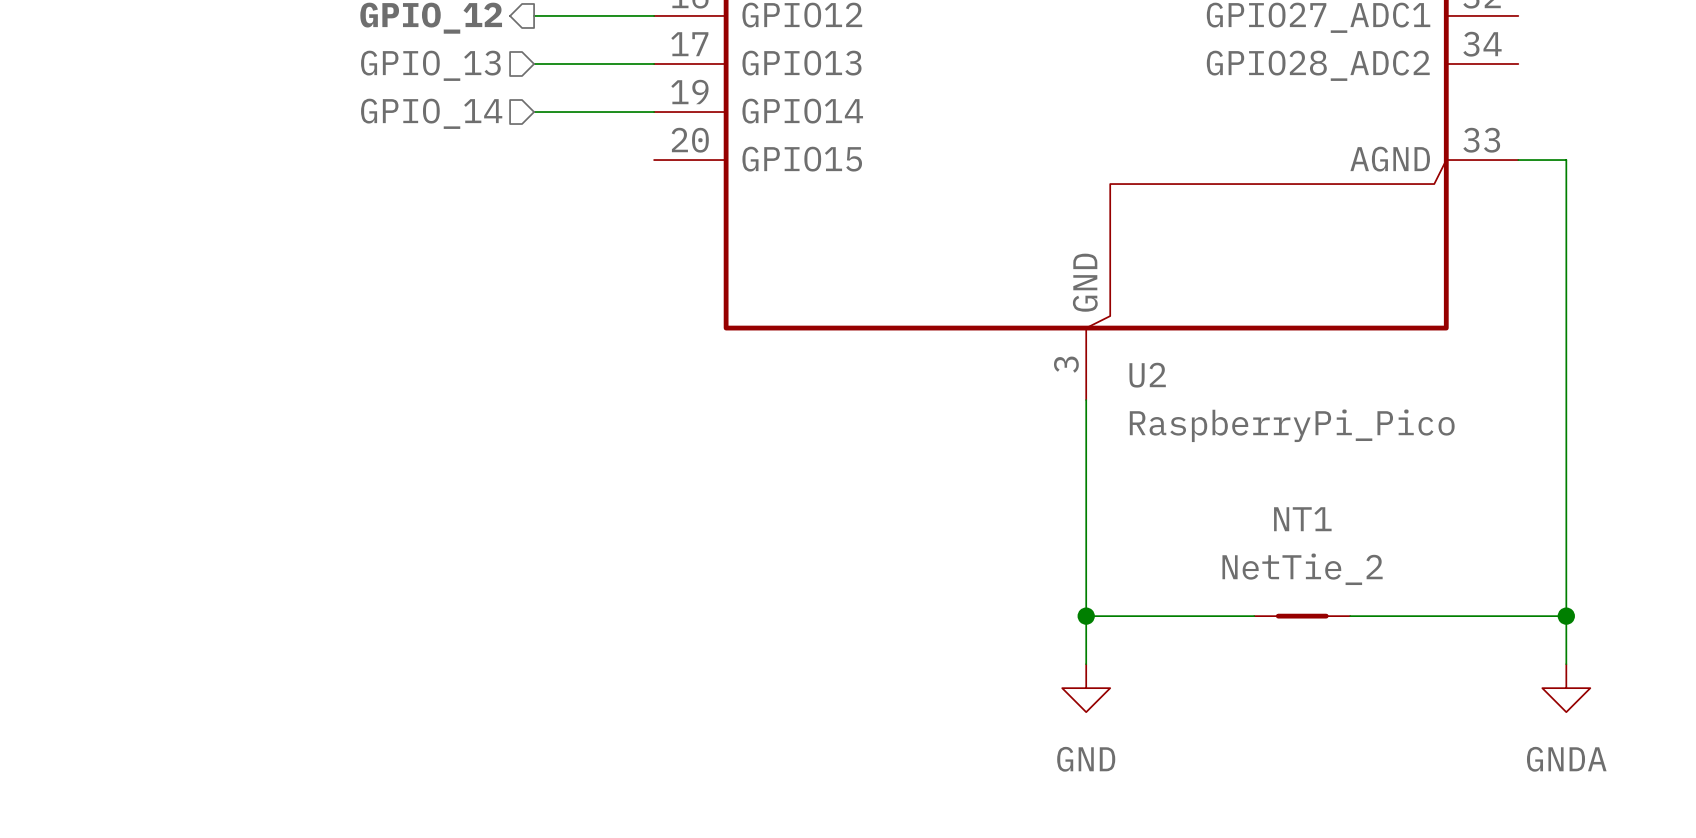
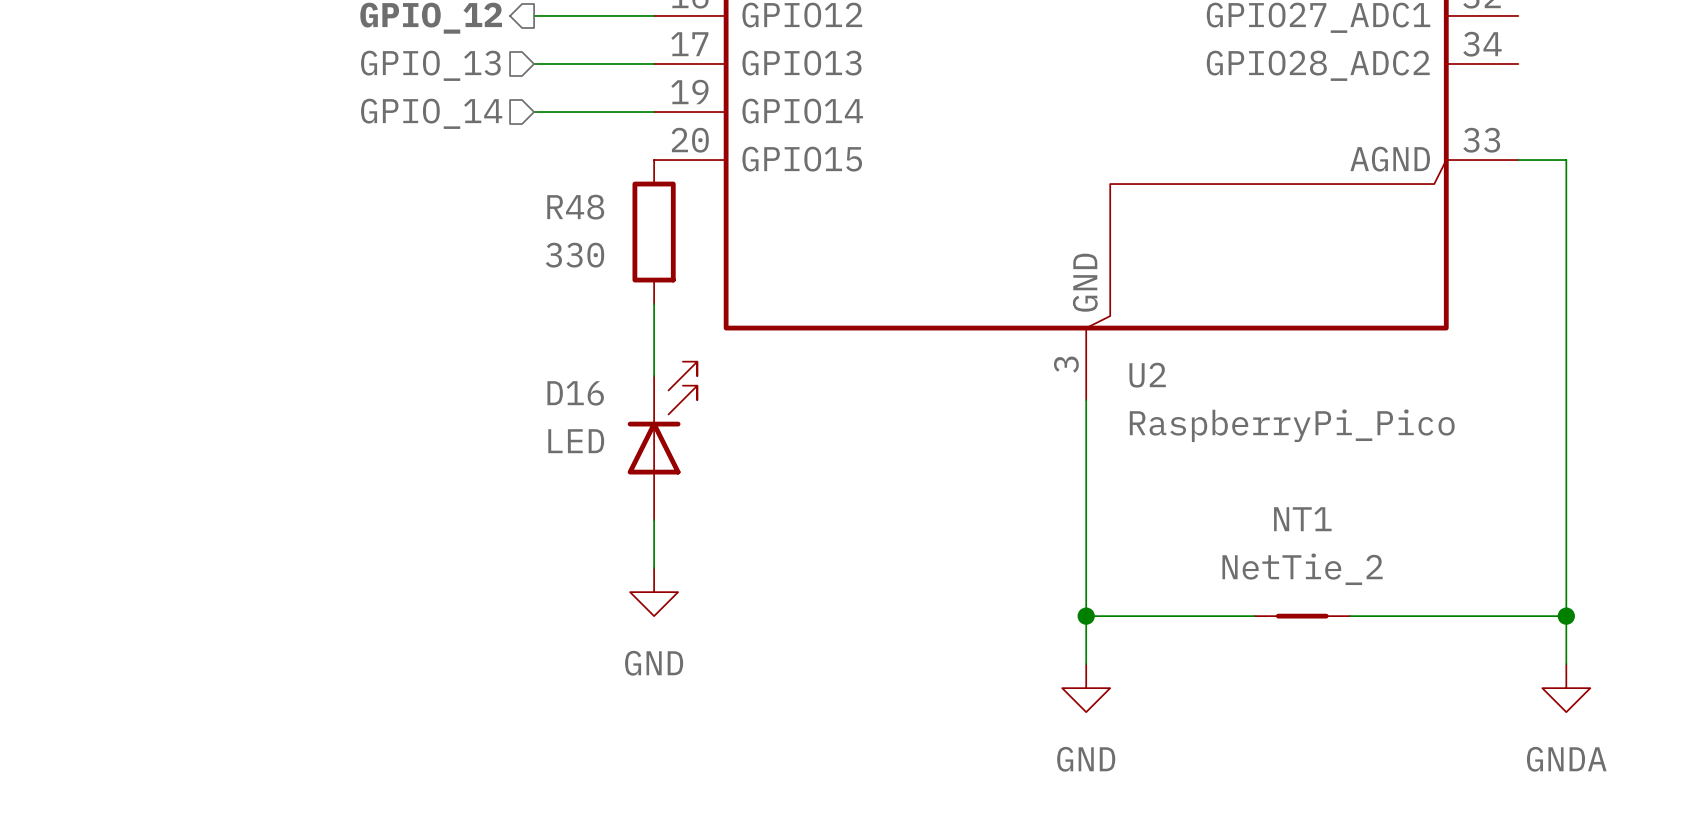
R48: none -> 330 (654, 232)
wire: none -> (654, 304) (654, 376)
D16: none -> LED (662, 440)
wire: none -> (654, 520) (654, 568)
power symbol: none -> GND (654, 592)

